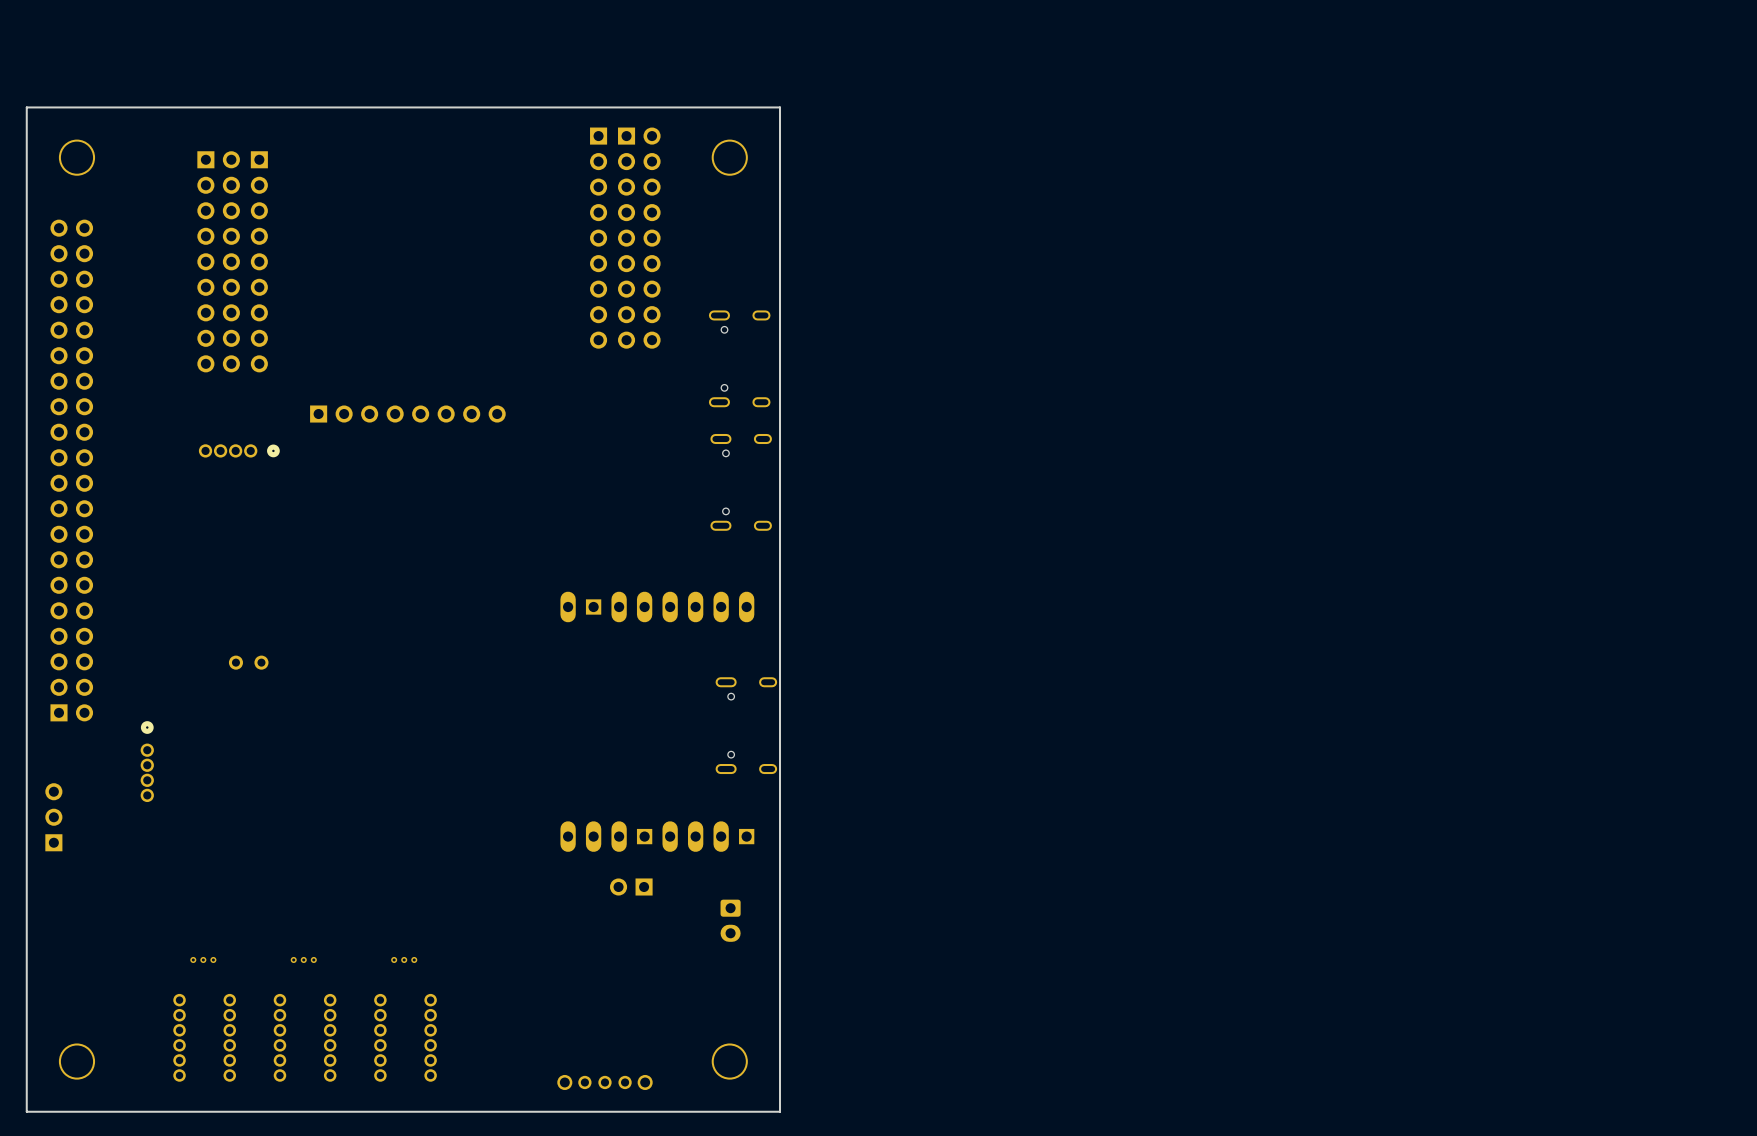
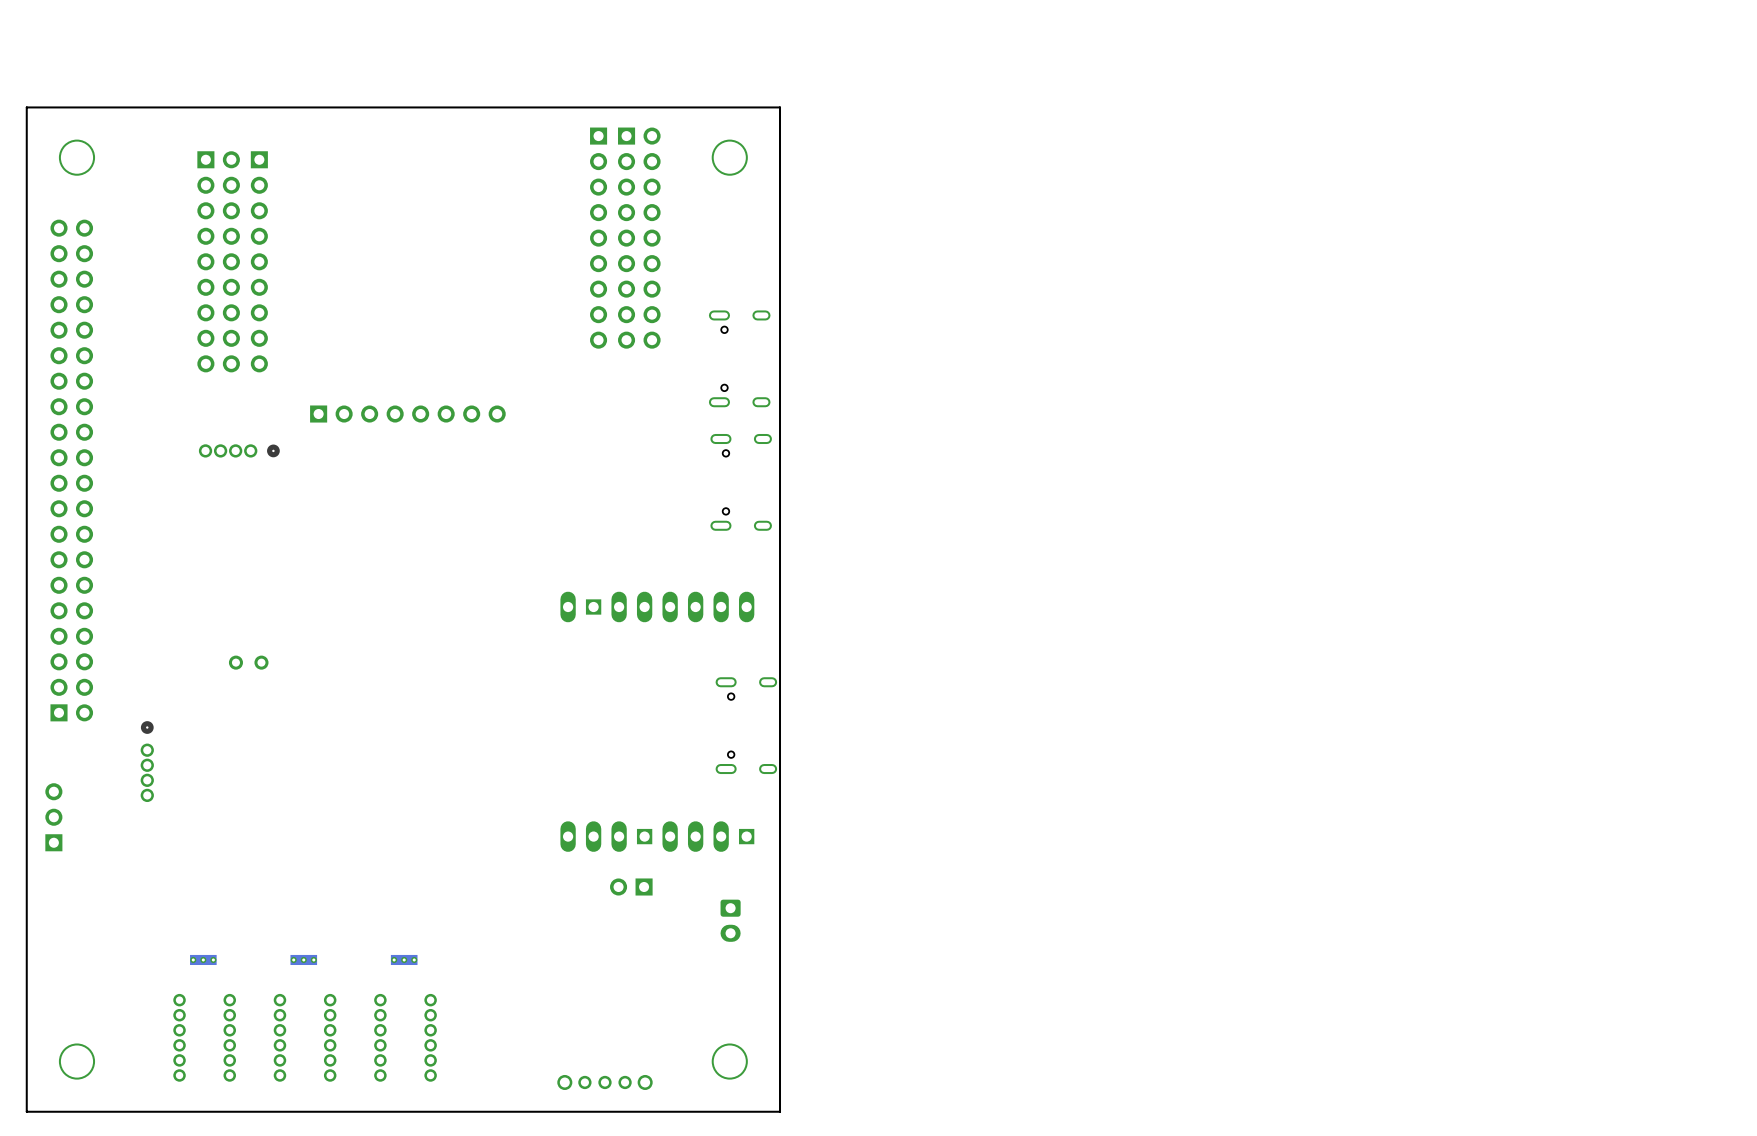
part footprint: [190, 956, 217, 963] -> [190, 954, 217, 966]
part footprint: [290, 956, 317, 963] -> [290, 954, 318, 966]
part footprint: [391, 956, 418, 963] -> [390, 954, 418, 966]

